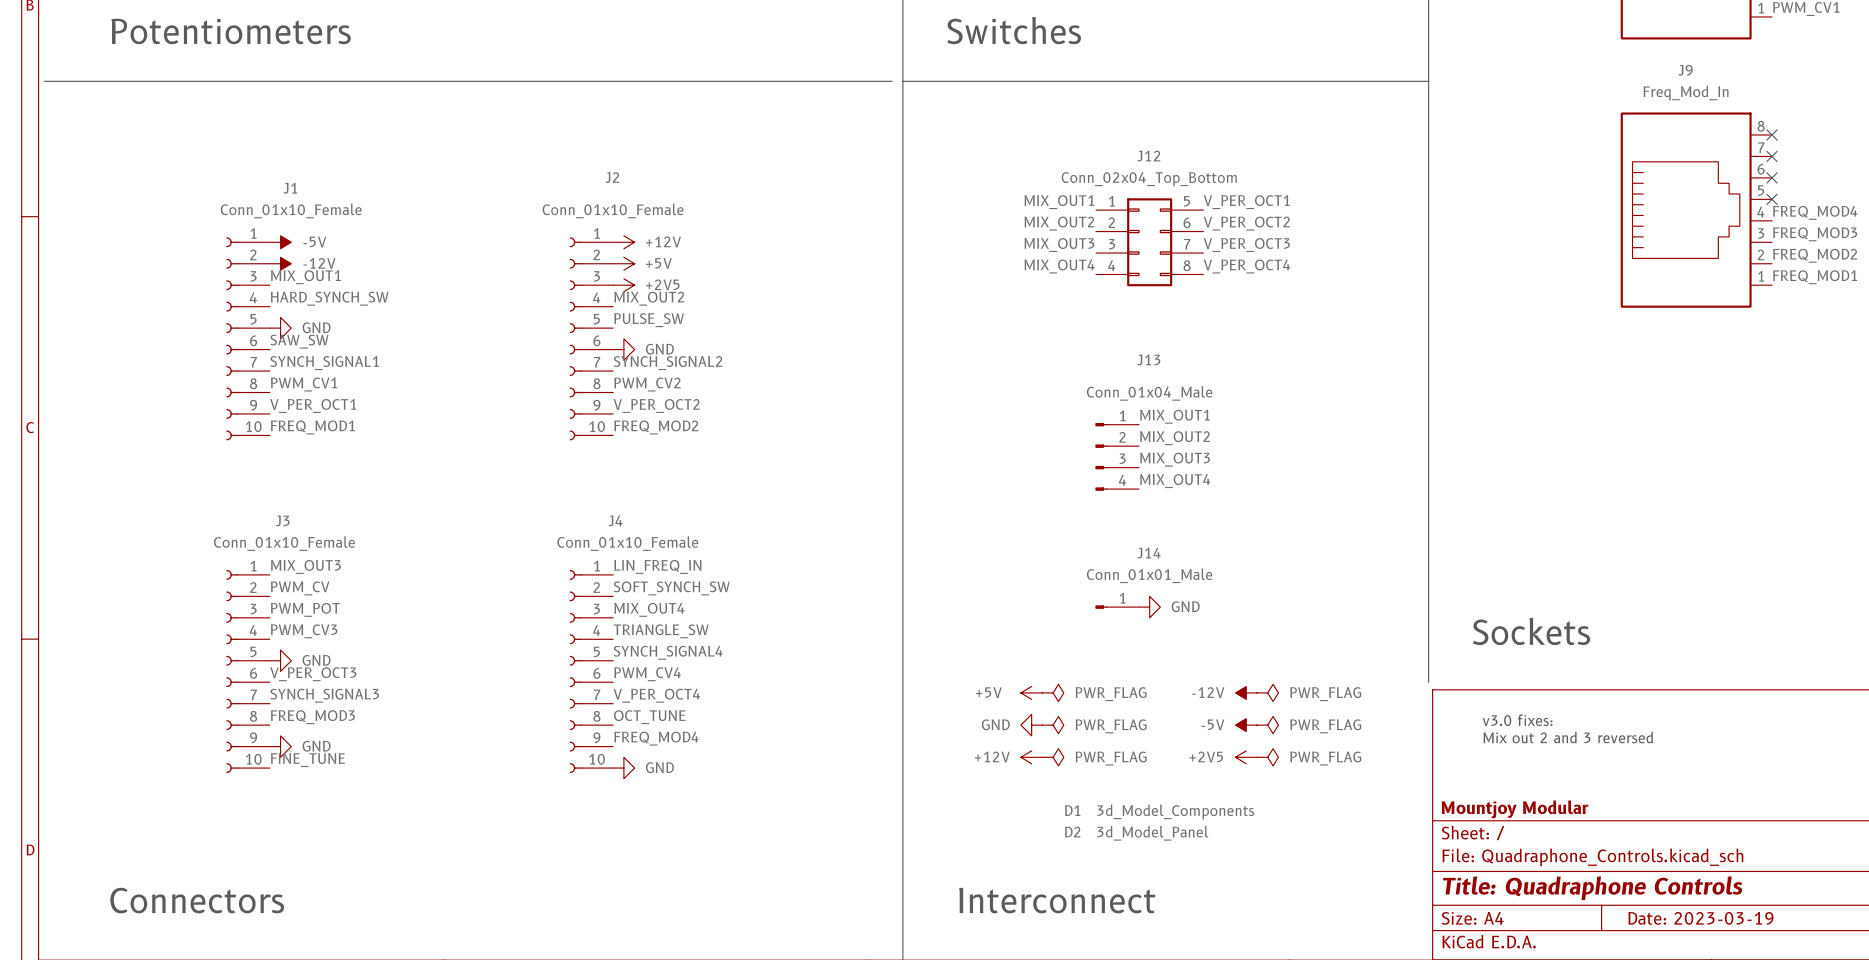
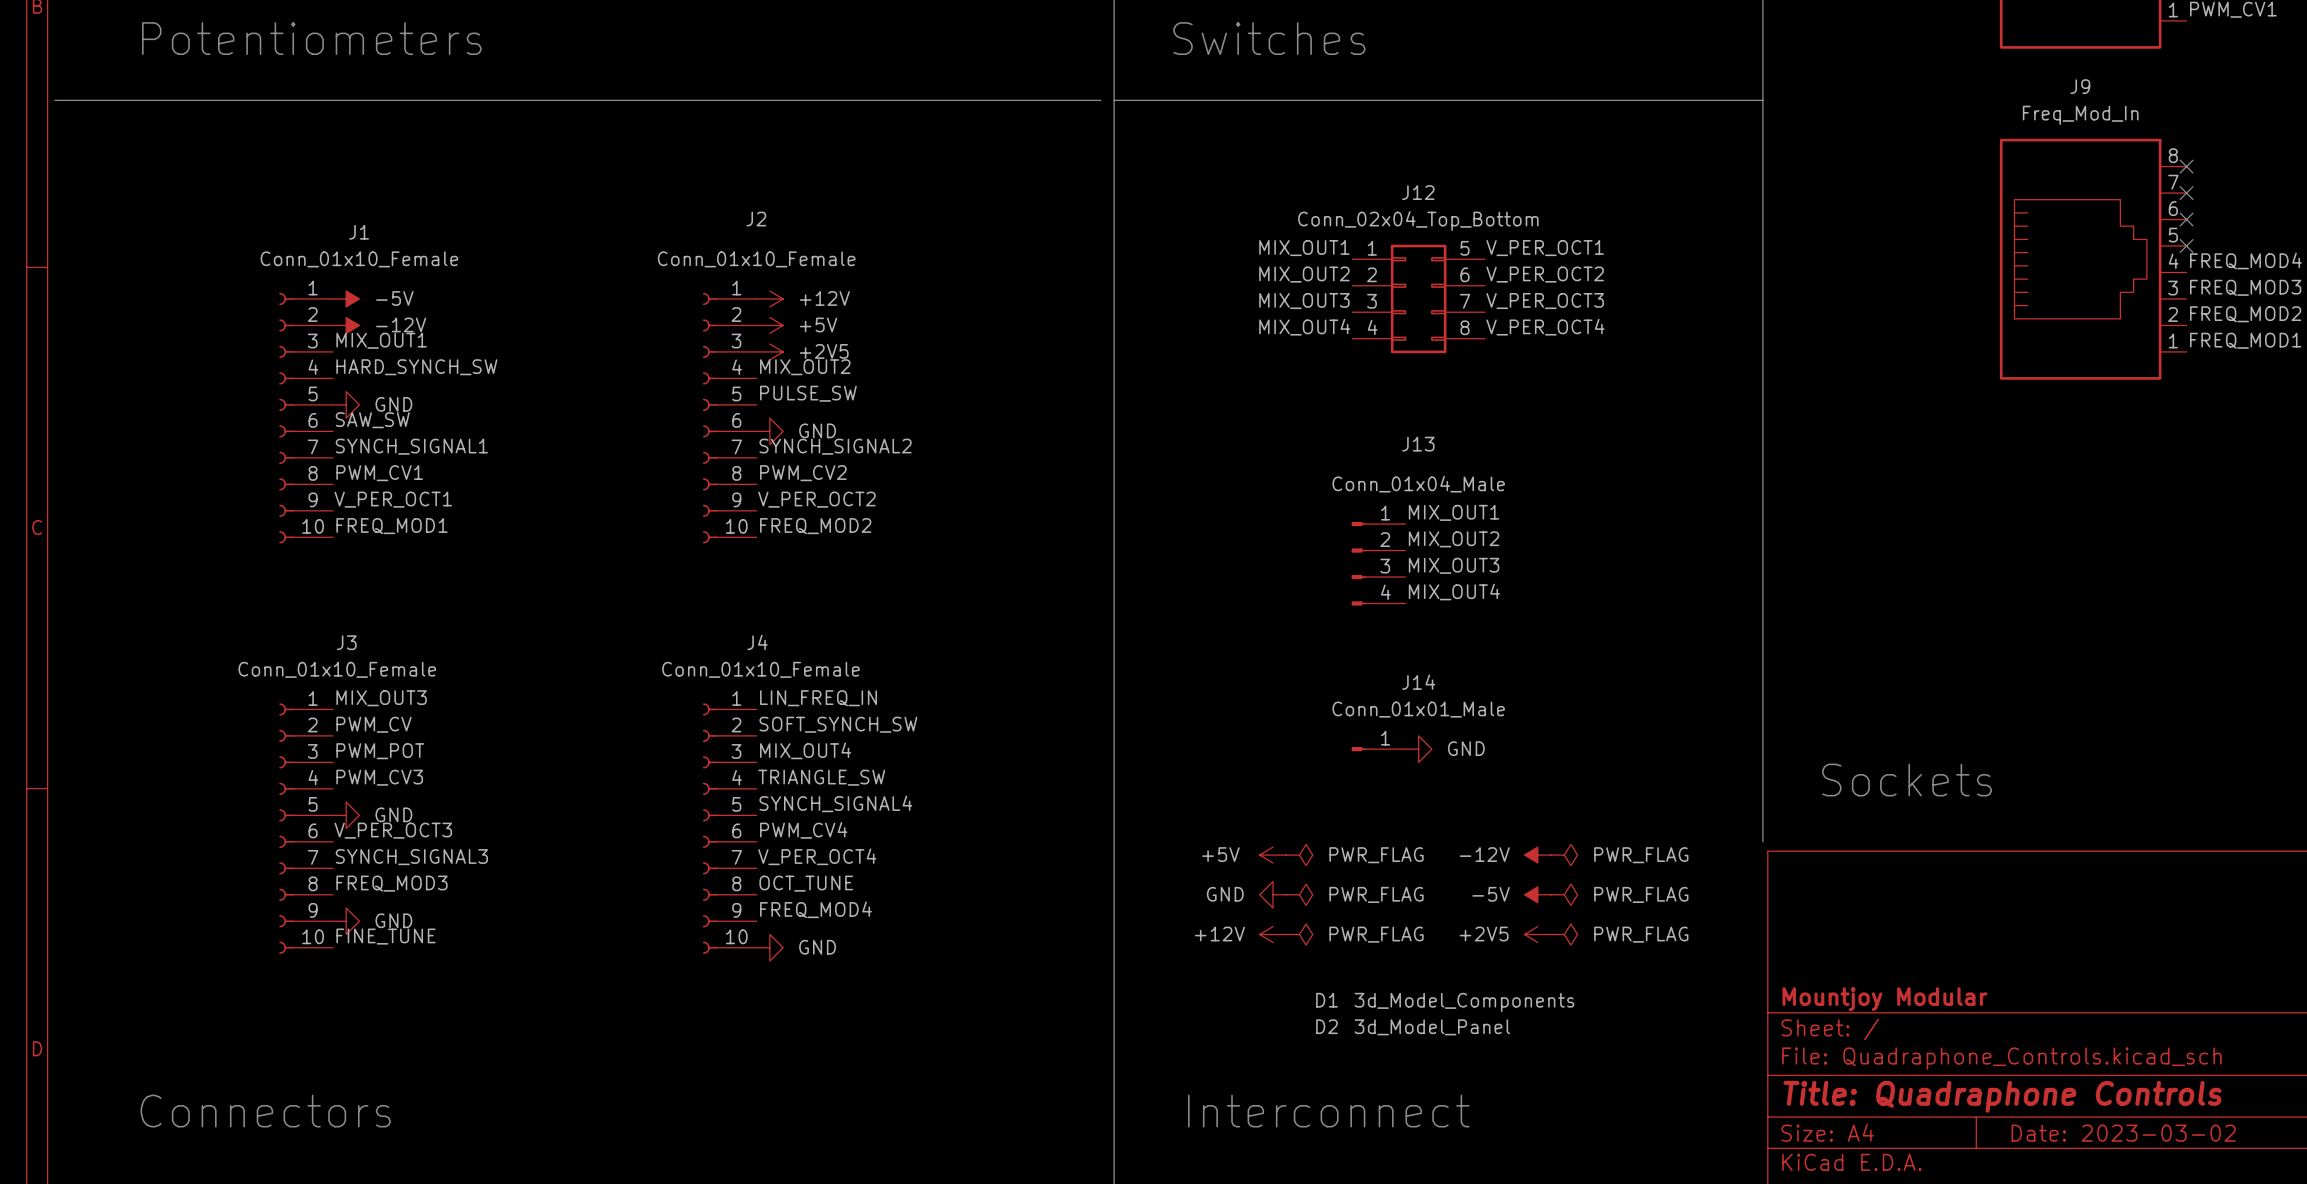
text: v3.0 fixes: (1517, 720) -> none
text: Mix out 2 and 3 reversed (1568, 737) -> none
title block: Date: 2023-03-19 (1700, 918) -> Date: 2023-03-02 (2123, 1133)

